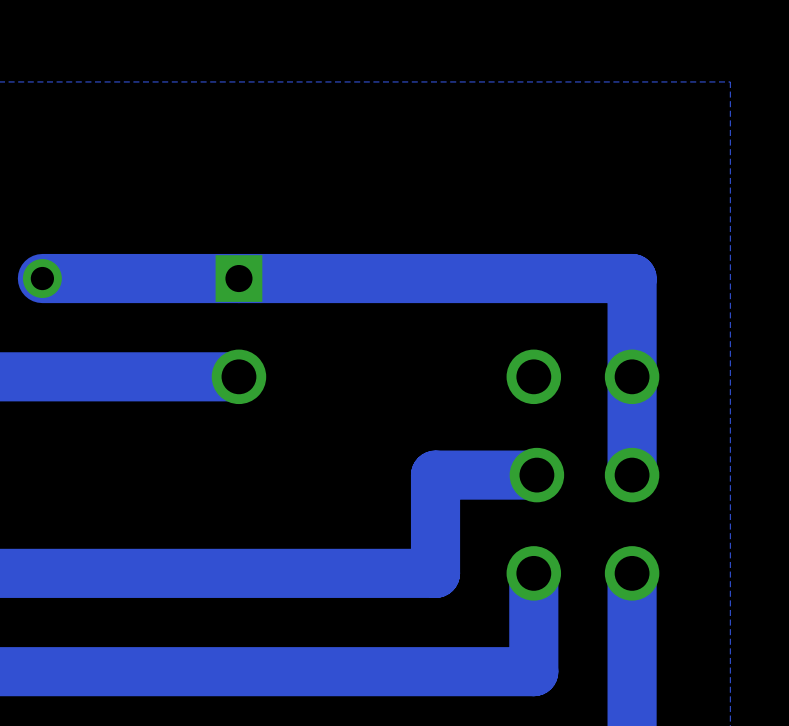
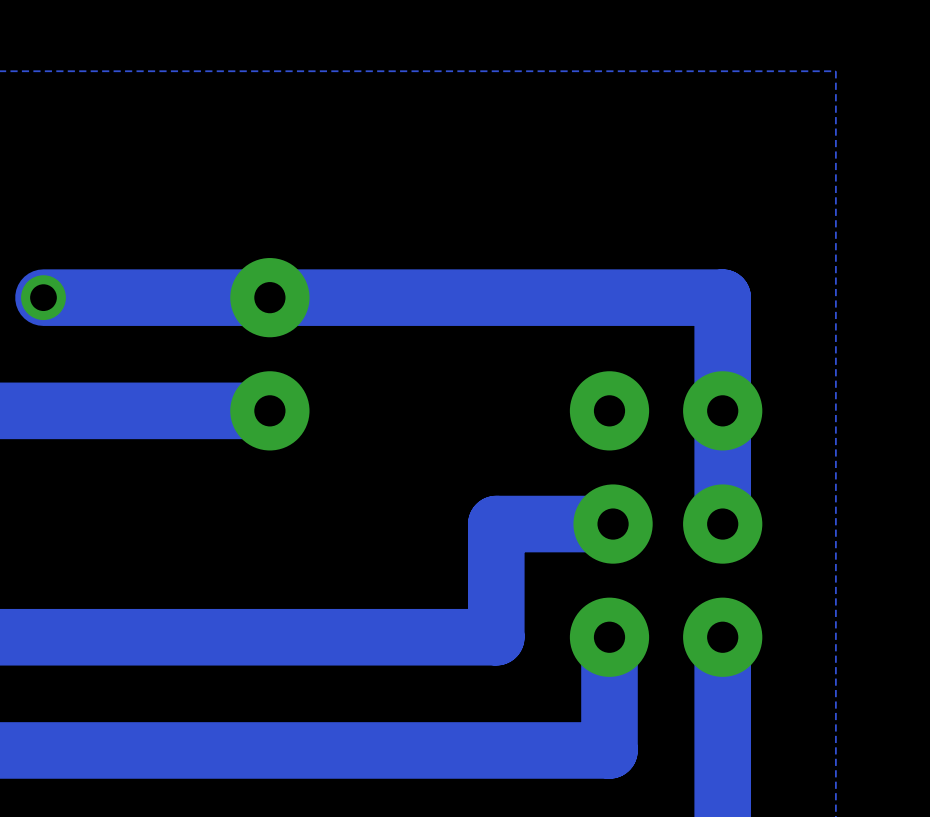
part footprint: [211, 255, 267, 405] -> [230, 258, 310, 451]
part footprint: [506, 349, 660, 601] -> [569, 371, 763, 677]

